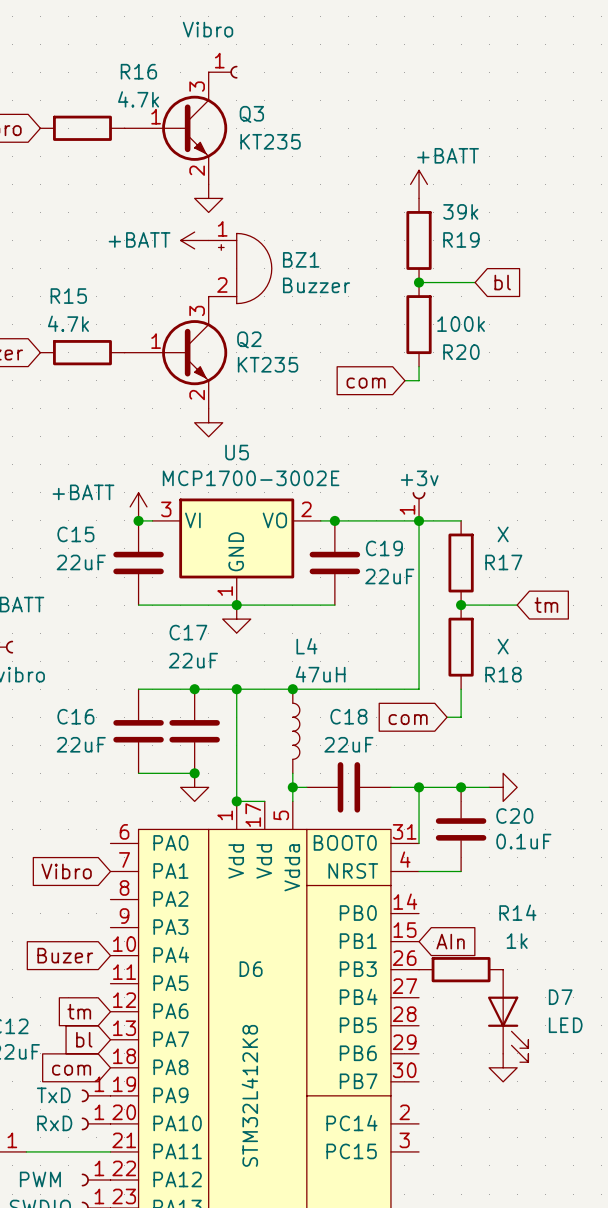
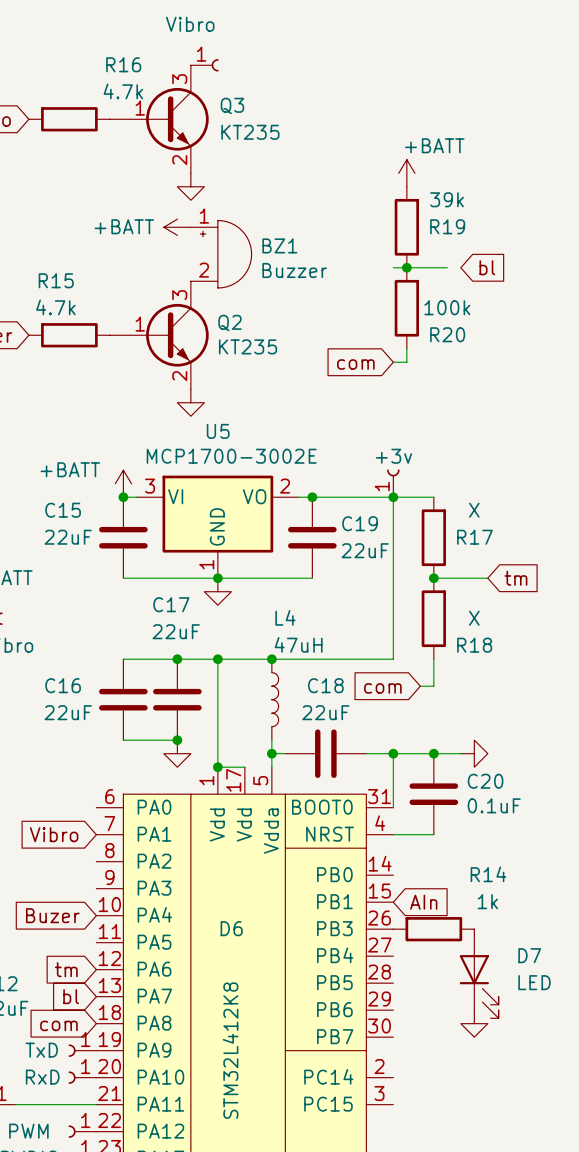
power symbol position: +BATT (419, 184) -> +BATT (406, 173)
R19 position: (419, 240) -> (406, 227)
junction position: (419, 282) -> (406, 267)
global label position: bl (502, 282) -> bl (487, 267)
R20 position: (419, 324) -> (406, 308)
wire: (419, 366) (419, 380) (404, 380) -> (406, 348) (406, 362) (393, 362)
global label position: com (366, 383) -> com (355, 364)

